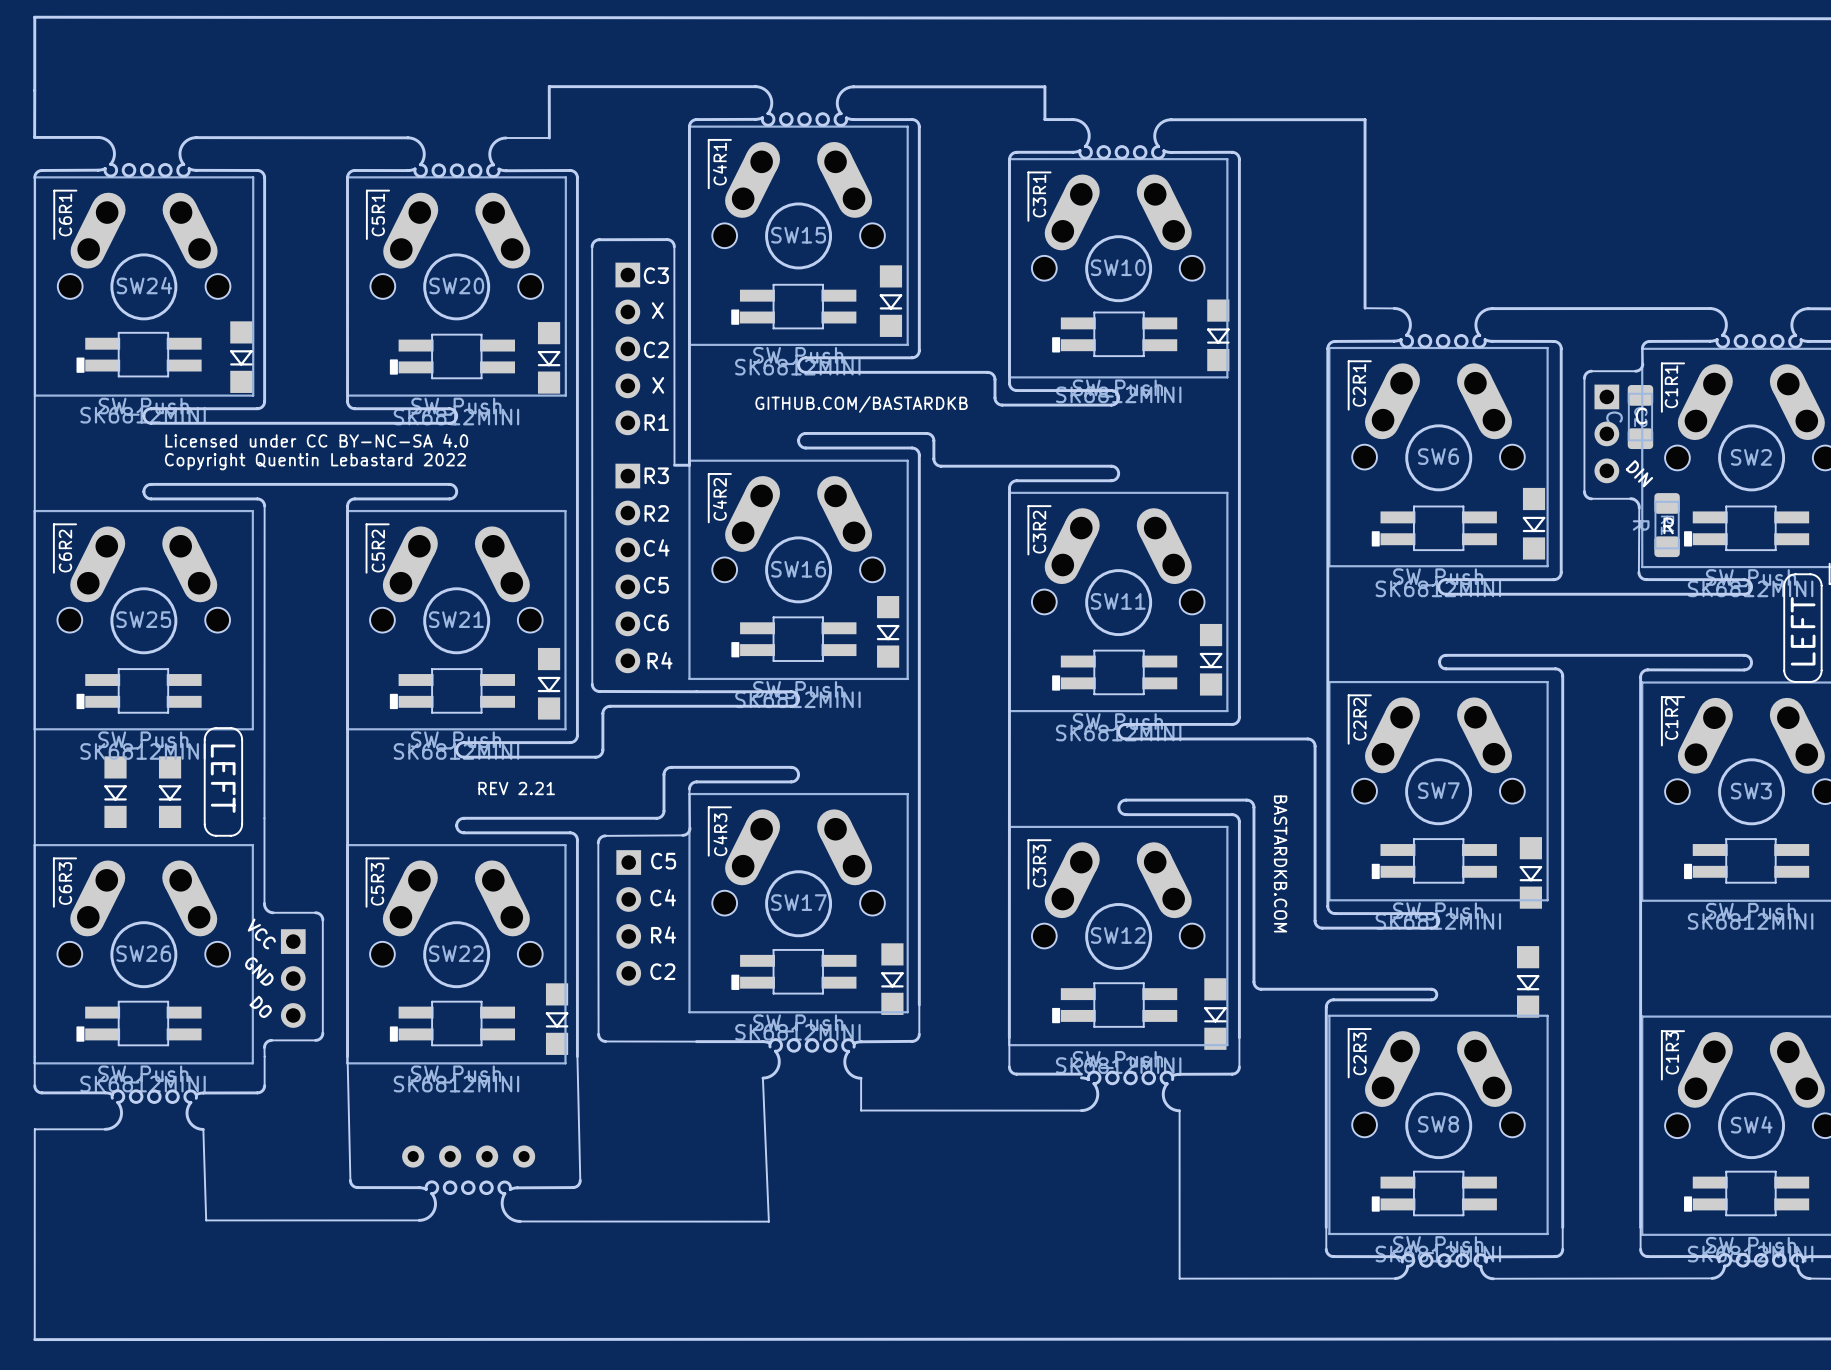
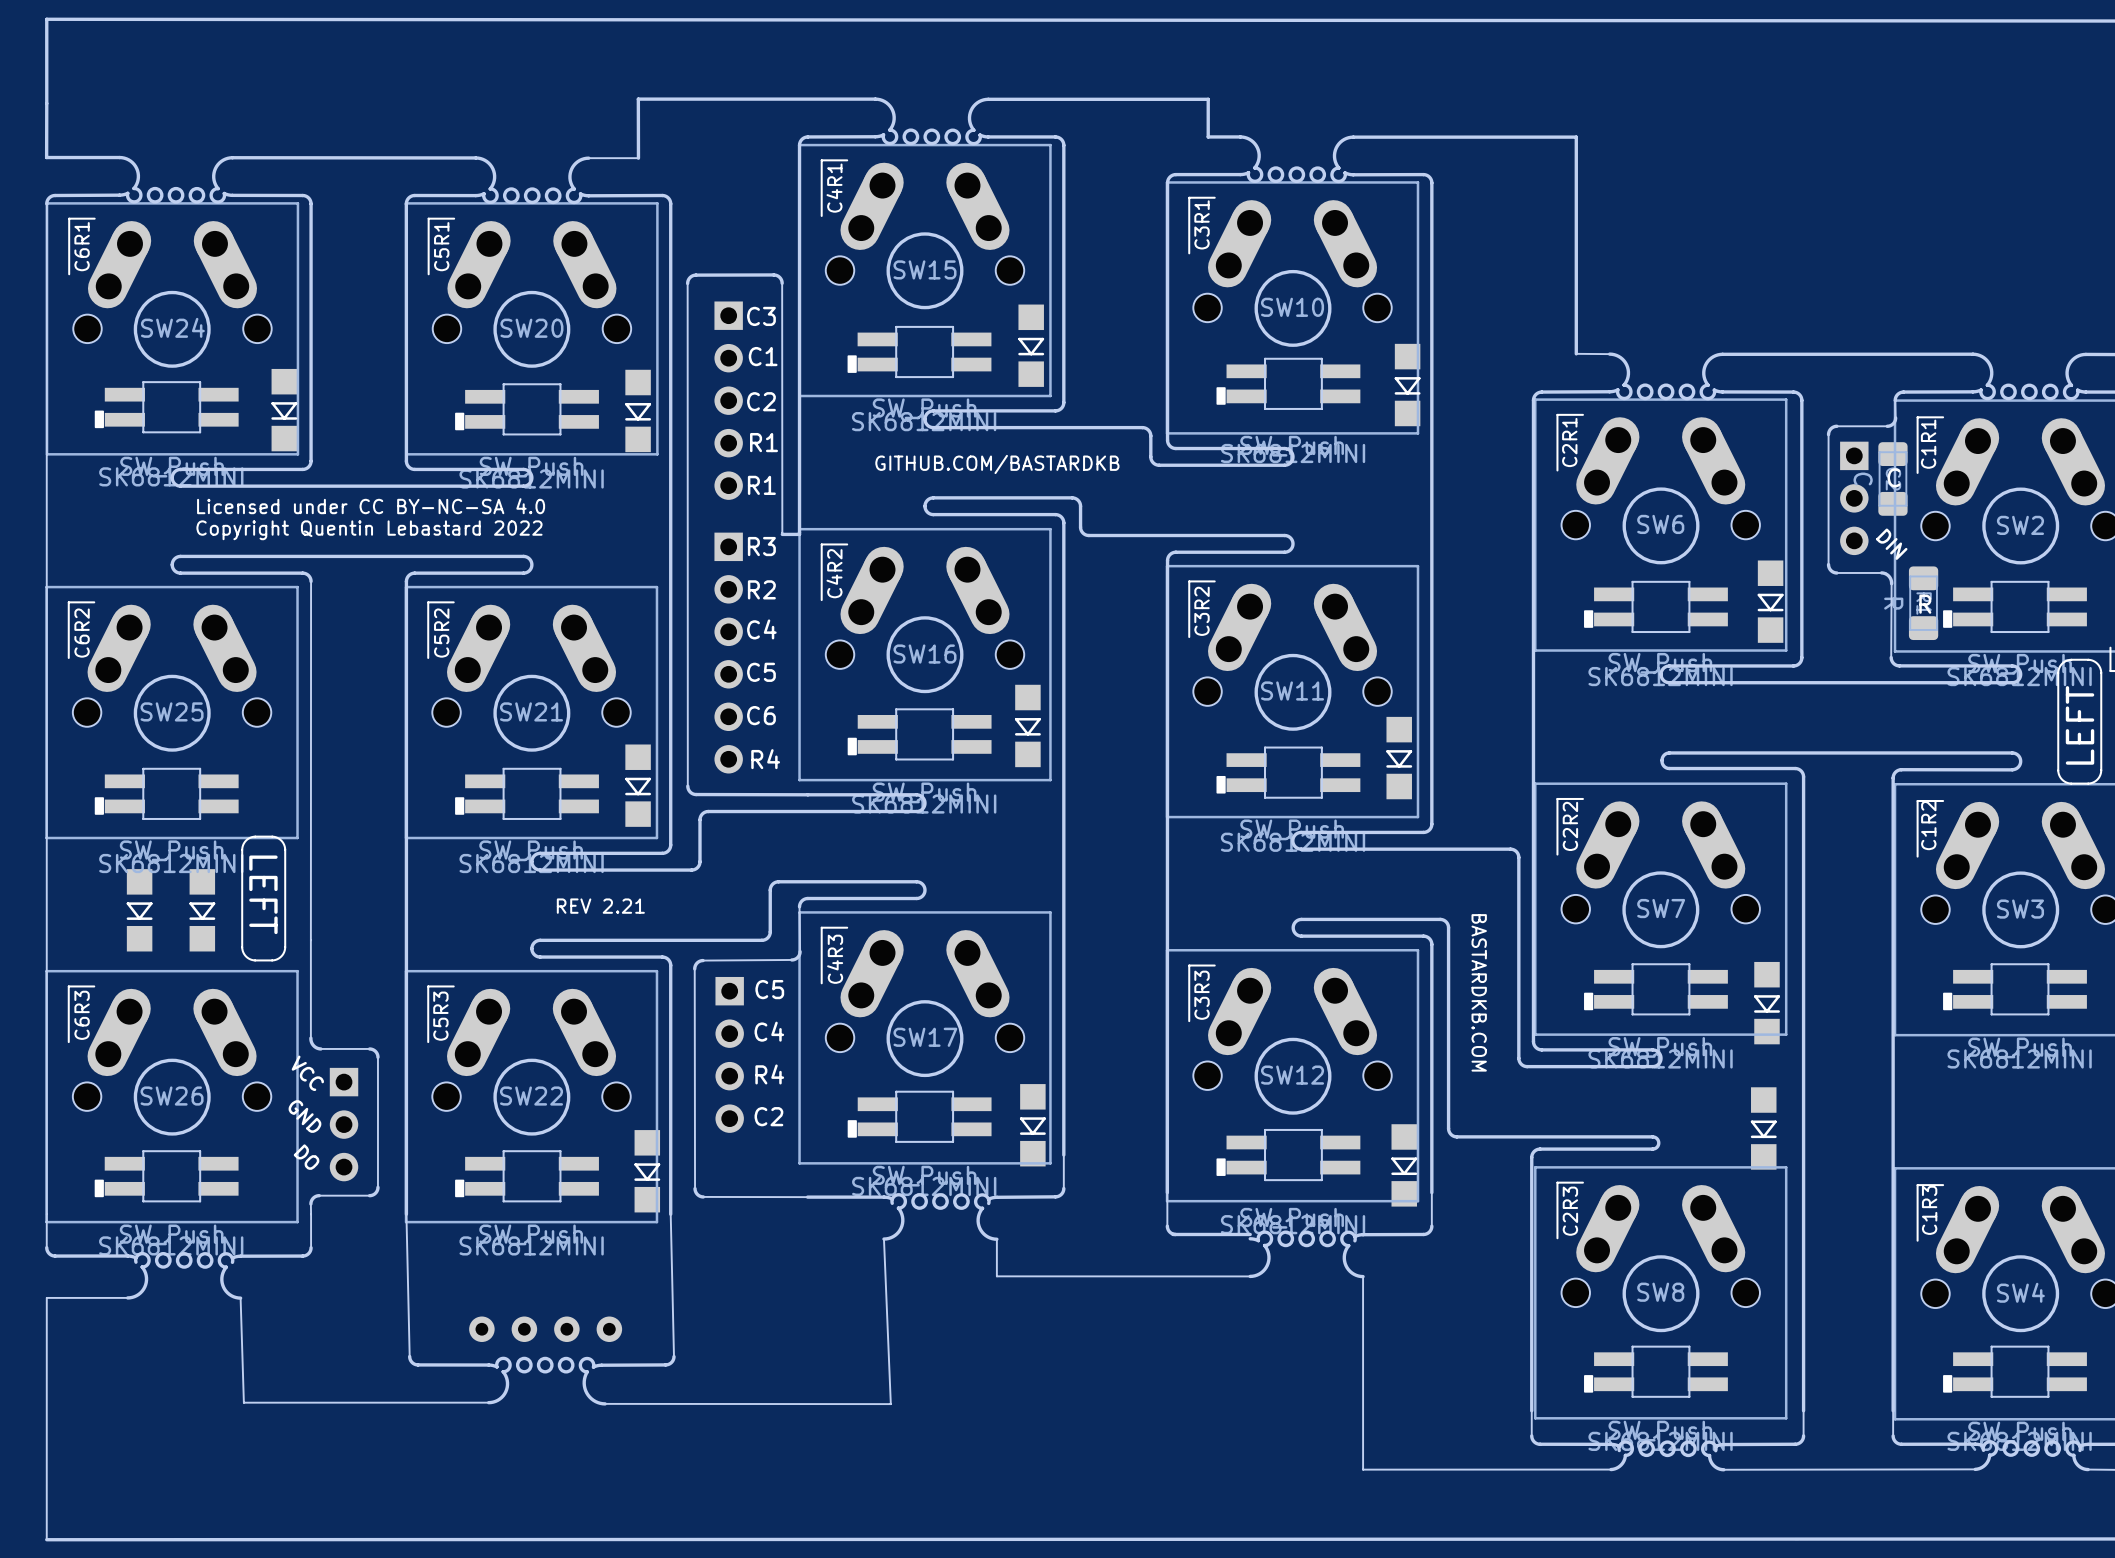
text: X (657, 310) -> C1 (763, 356)
text: X (658, 385) -> R1 (764, 442)

